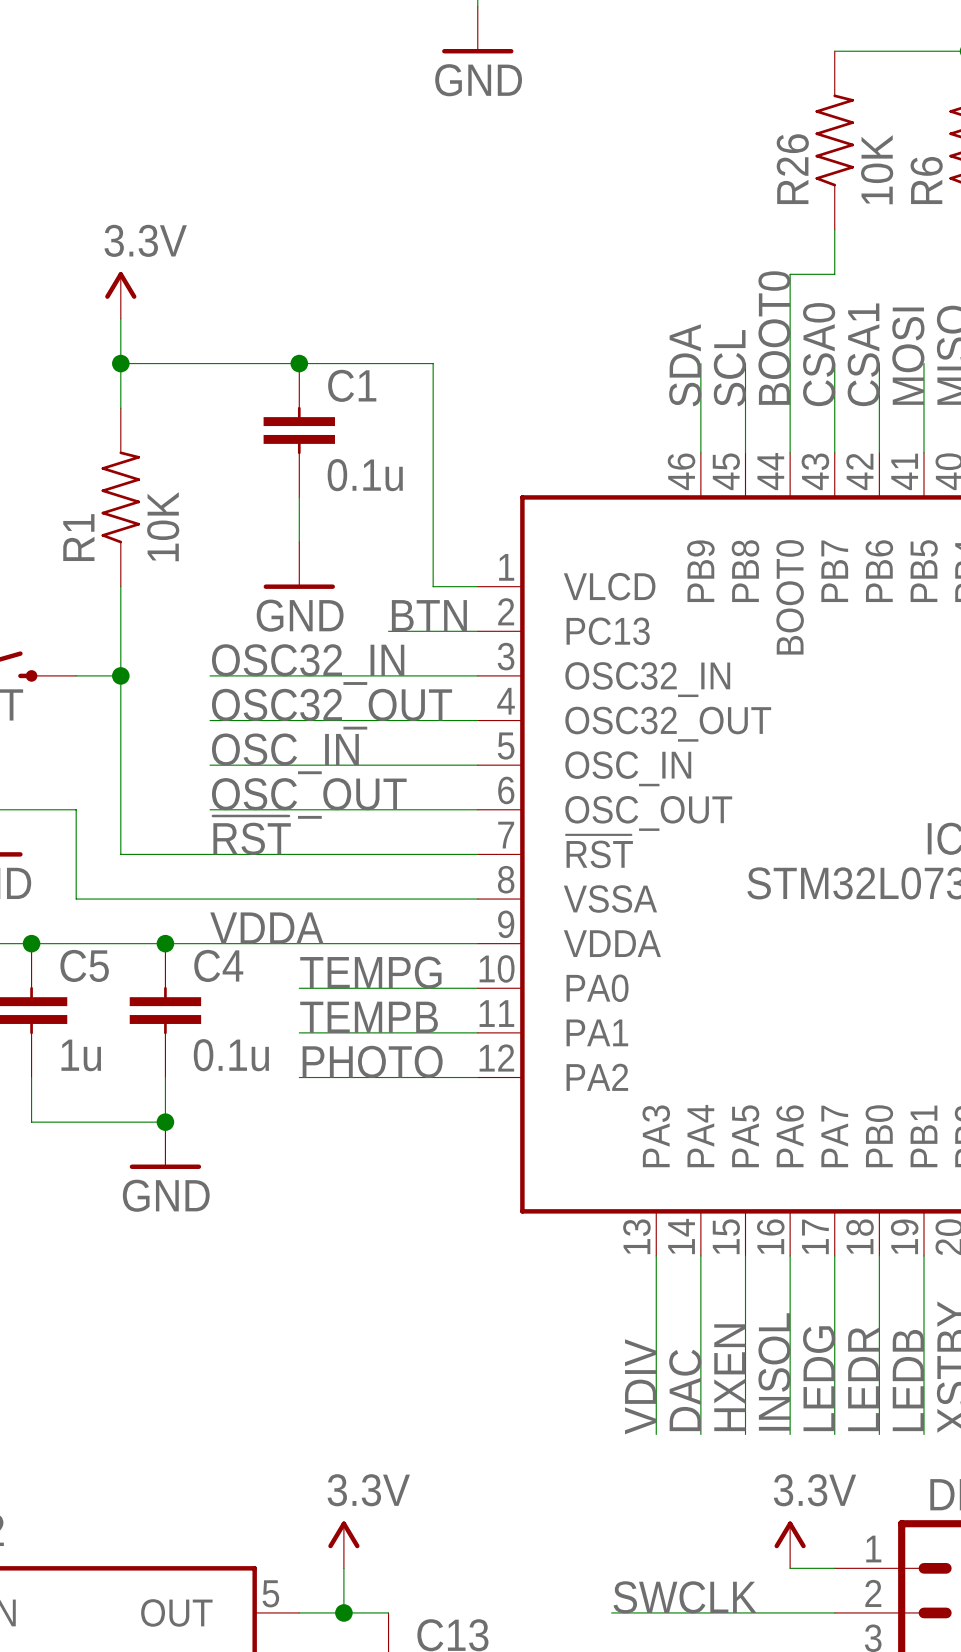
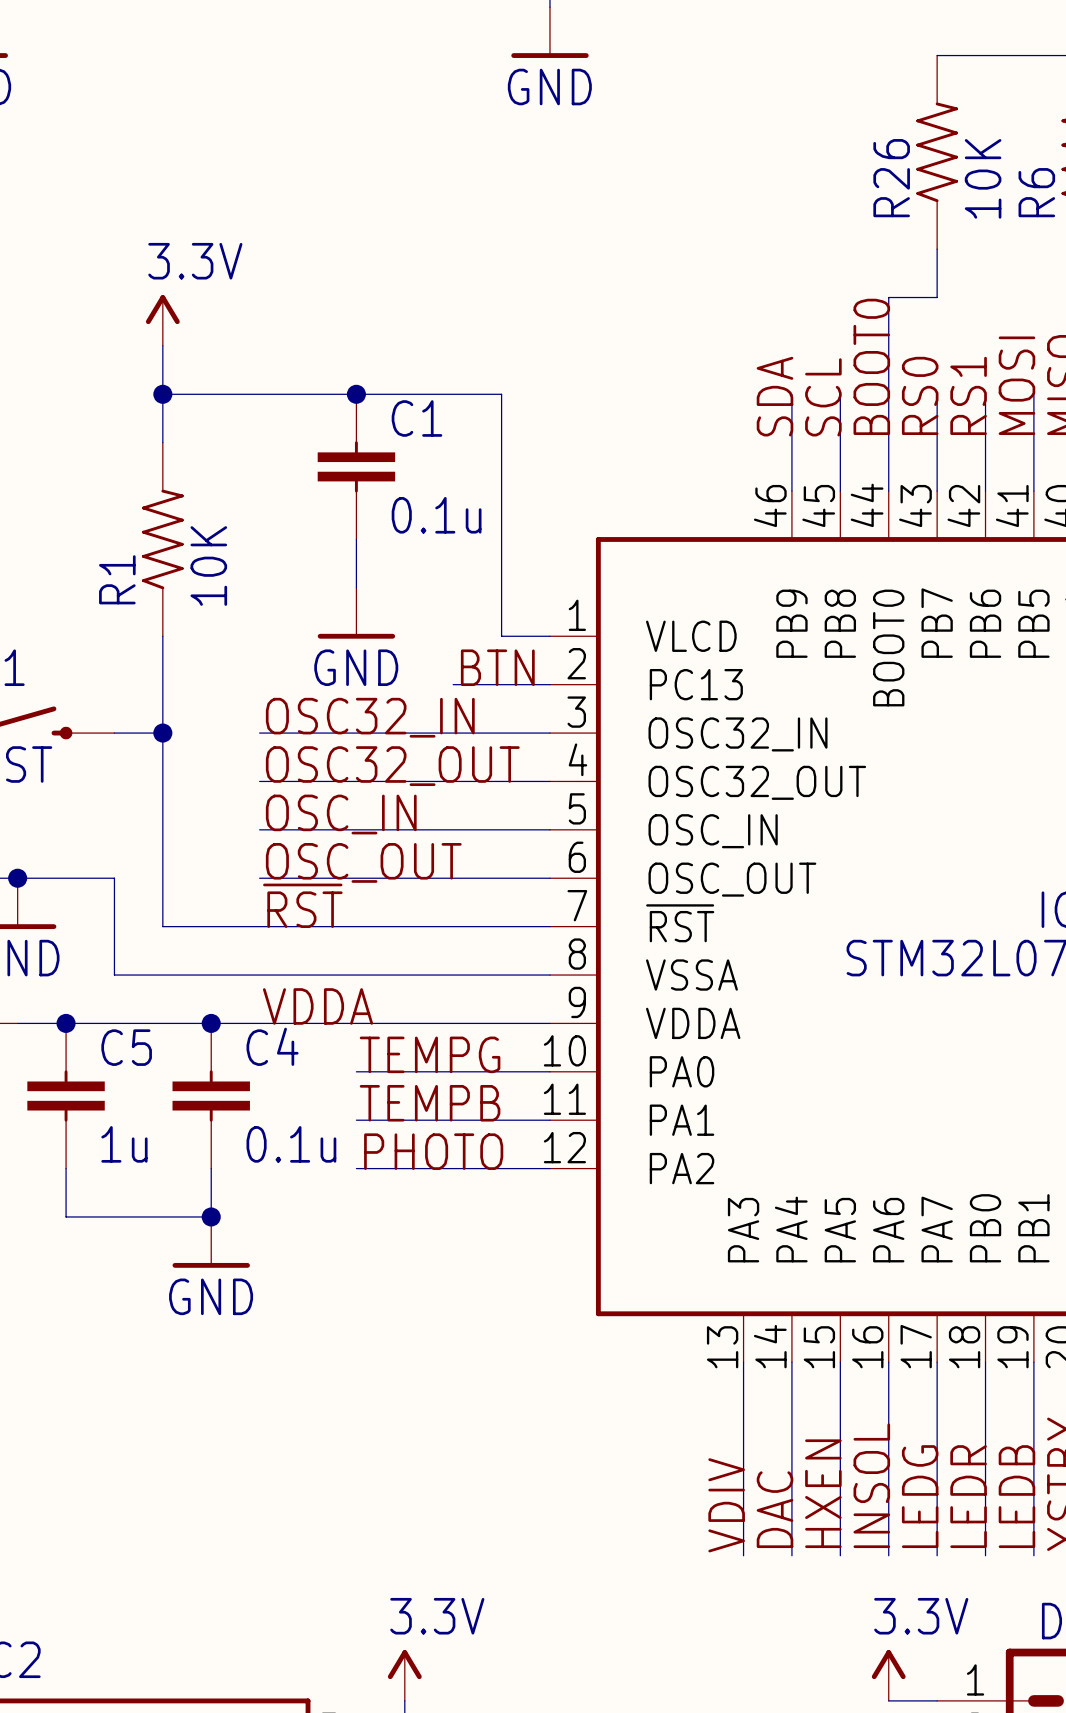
label: CSA0 (819, 354) -> RS0 (920, 395)
label: CSA1 (863, 354) -> RS1 (968, 395)

